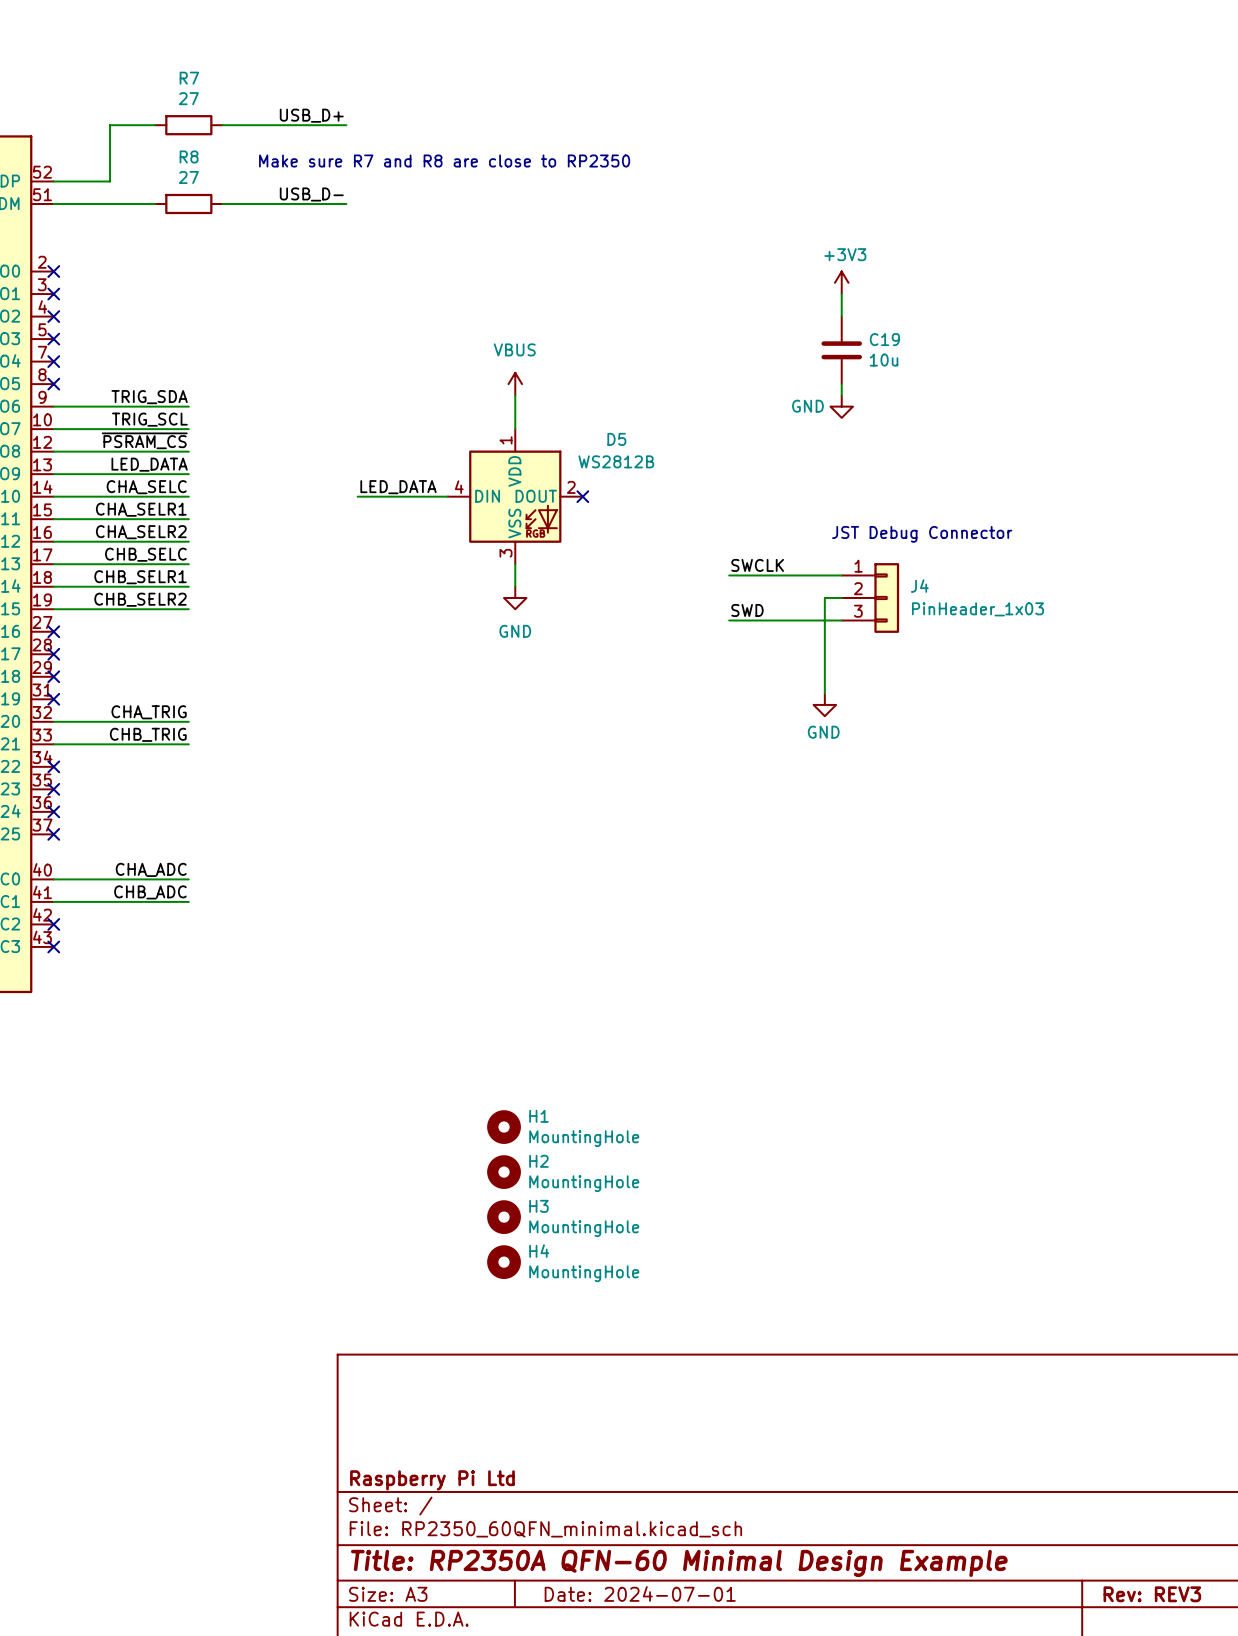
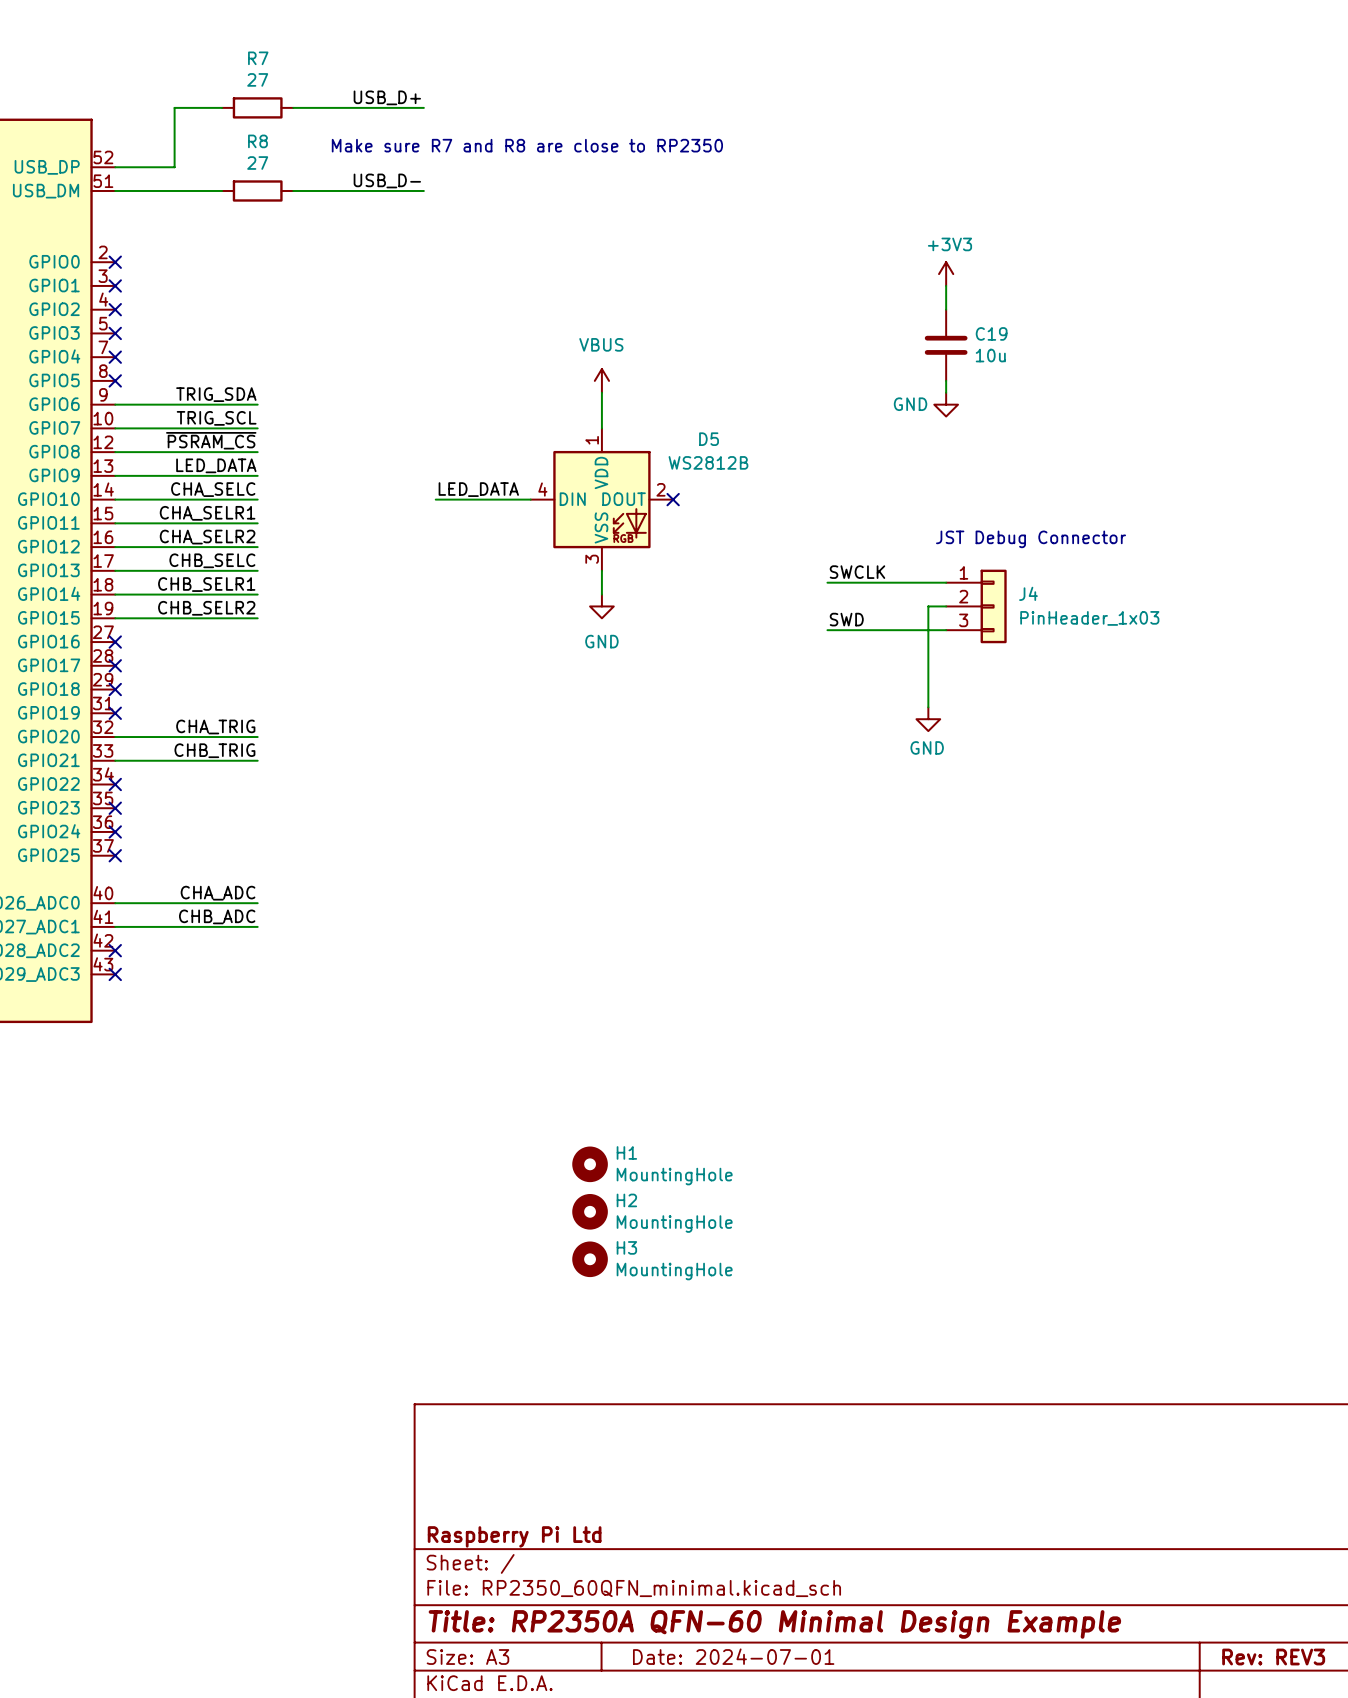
H4: MountingHole (504, 1262) -> none

